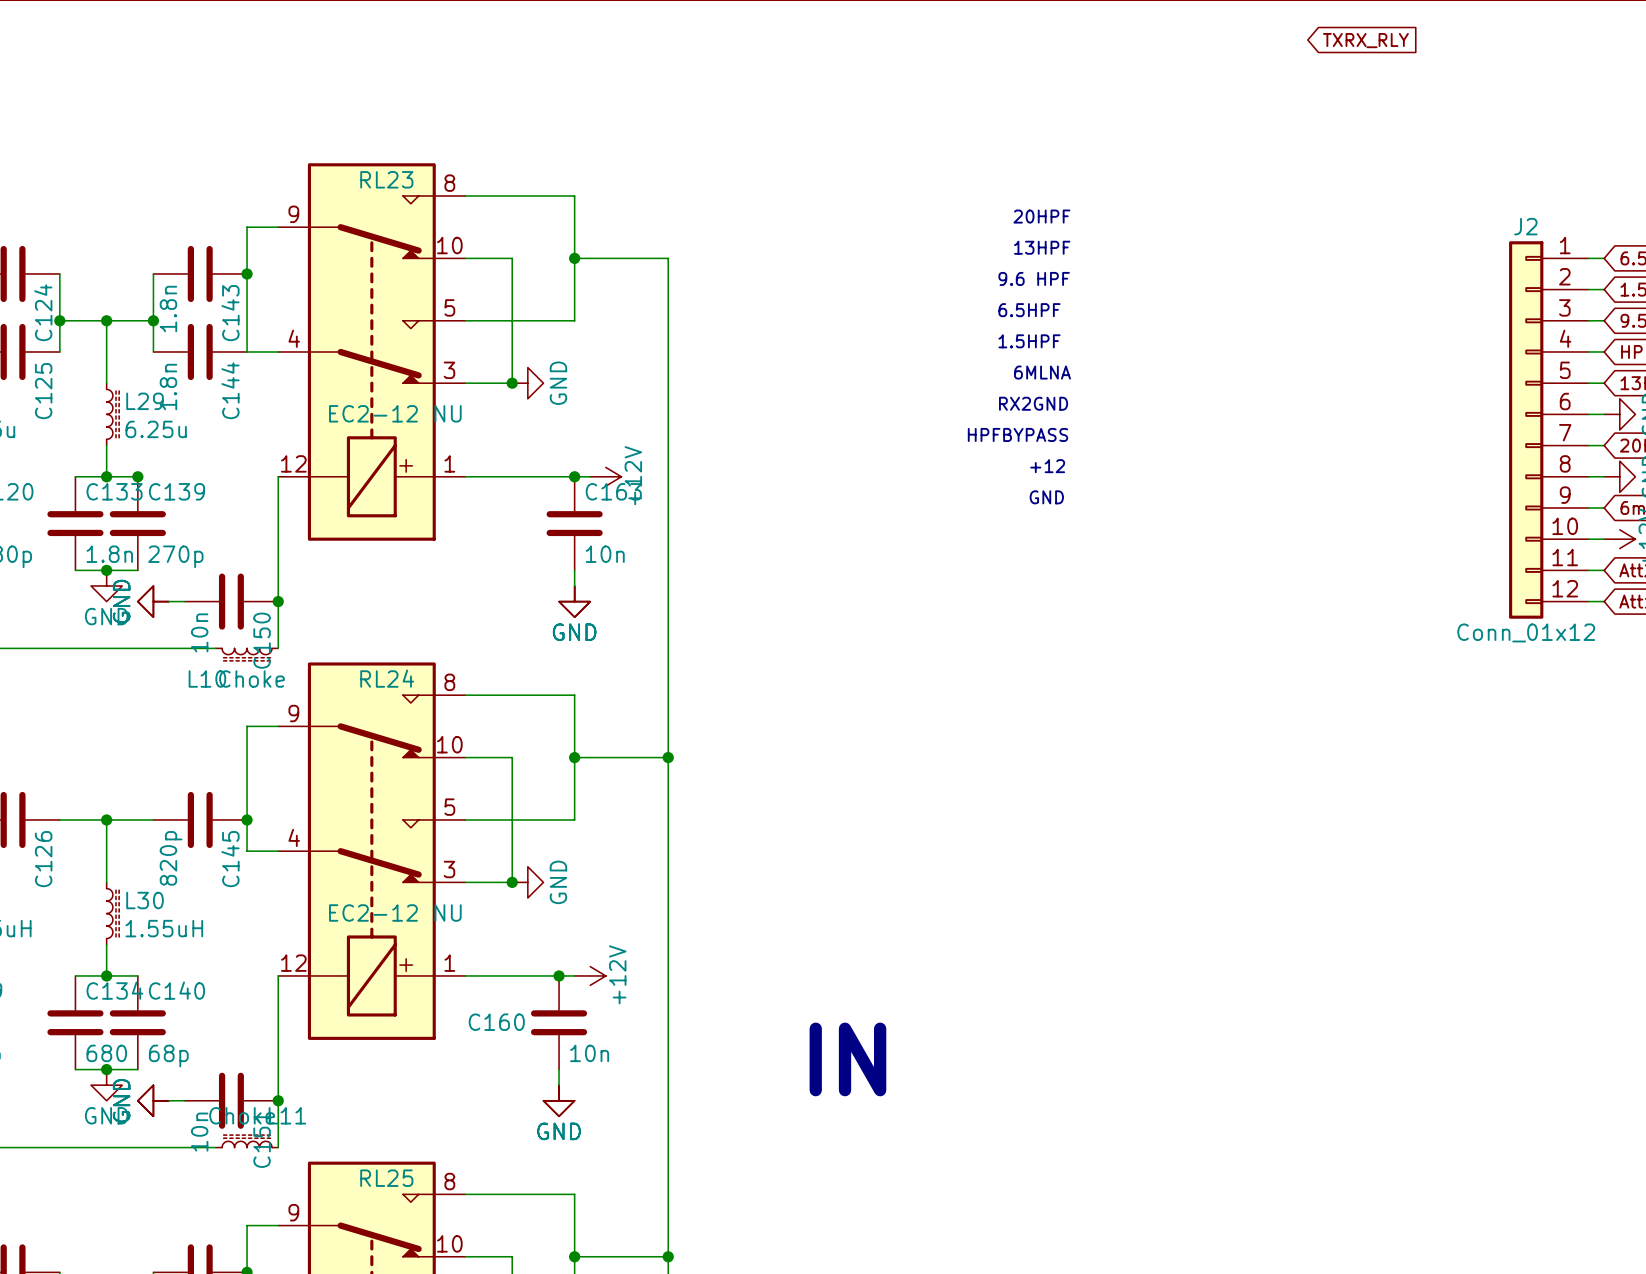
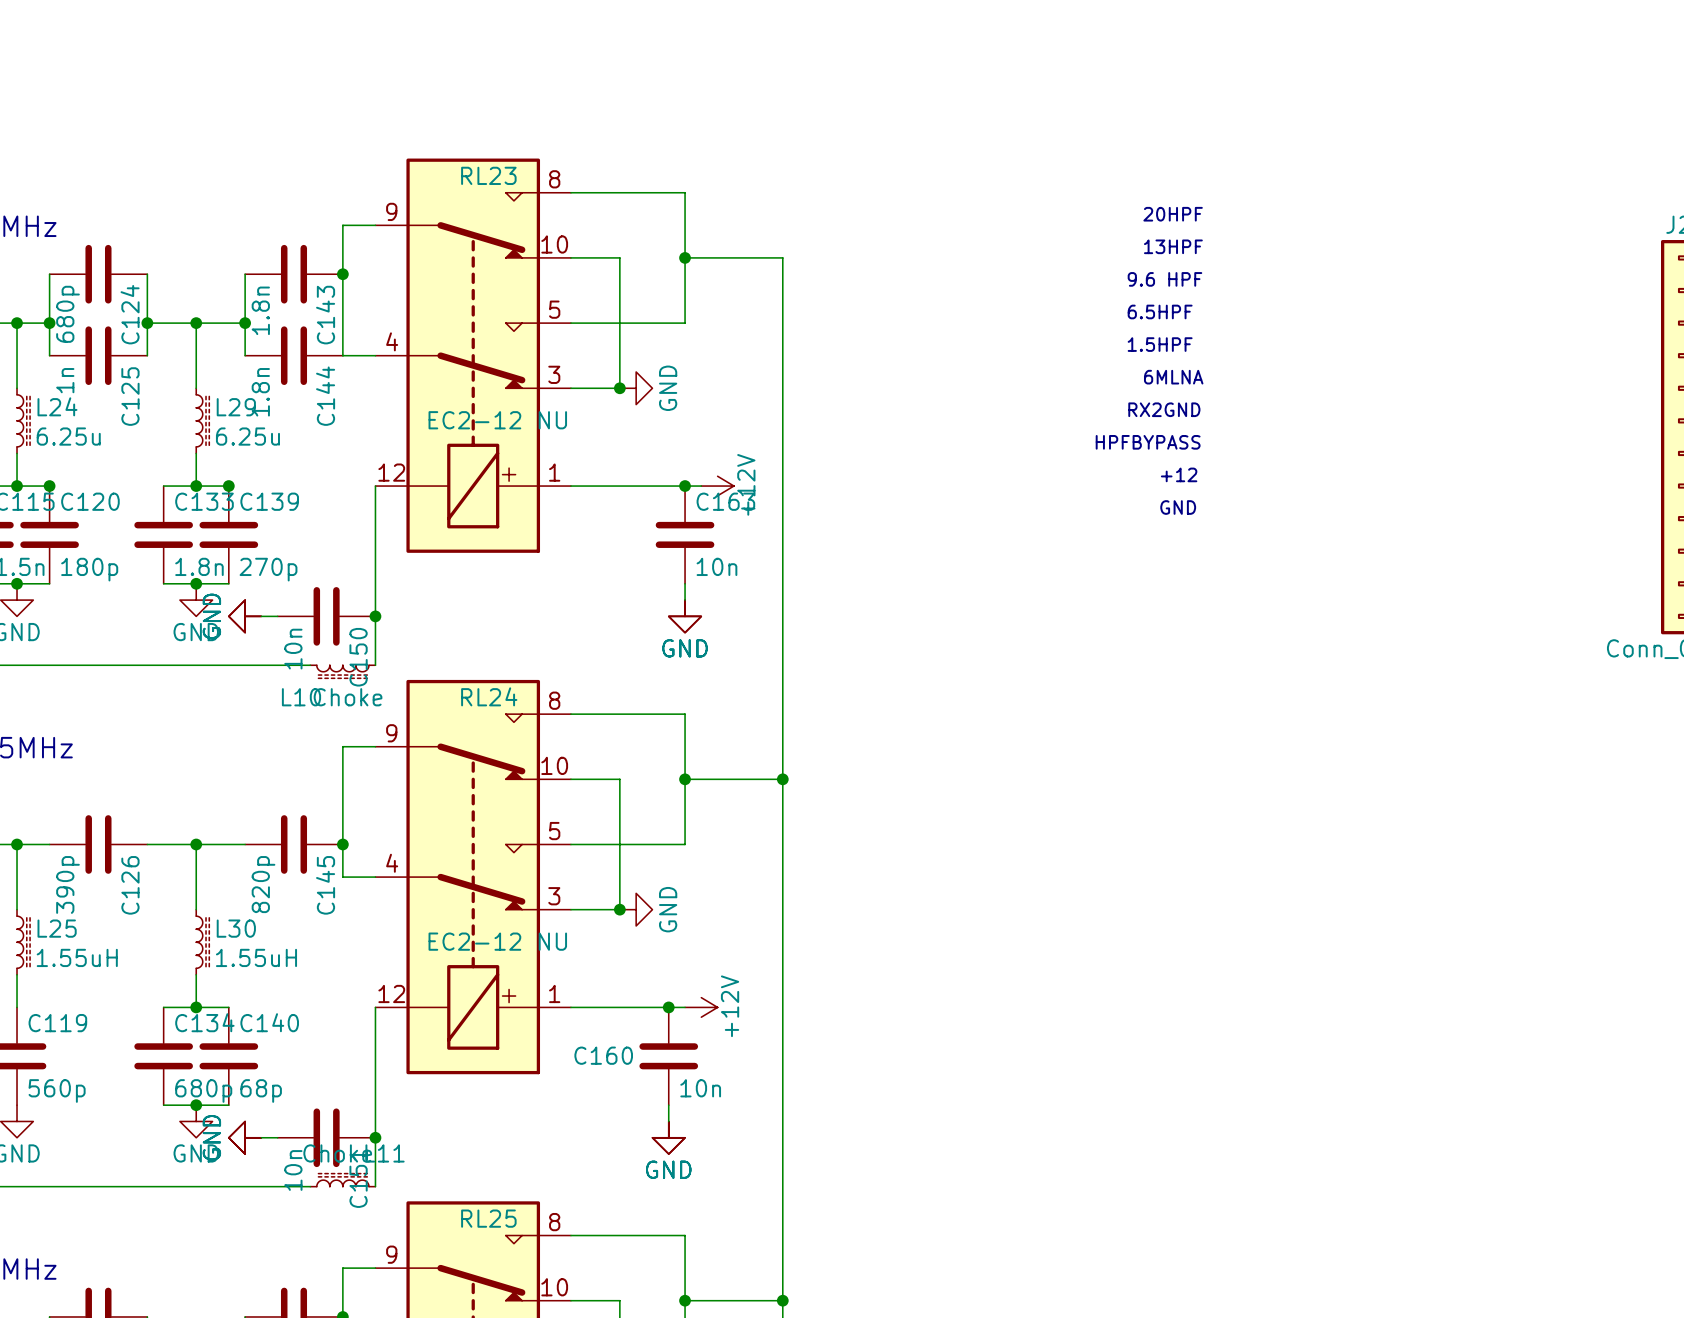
global label: TXRX_RLY (1365, 40) -> none
C134 value: 680 (106, 1053) -> 680p (203, 1090)
text: IN (847, 1059) -> none

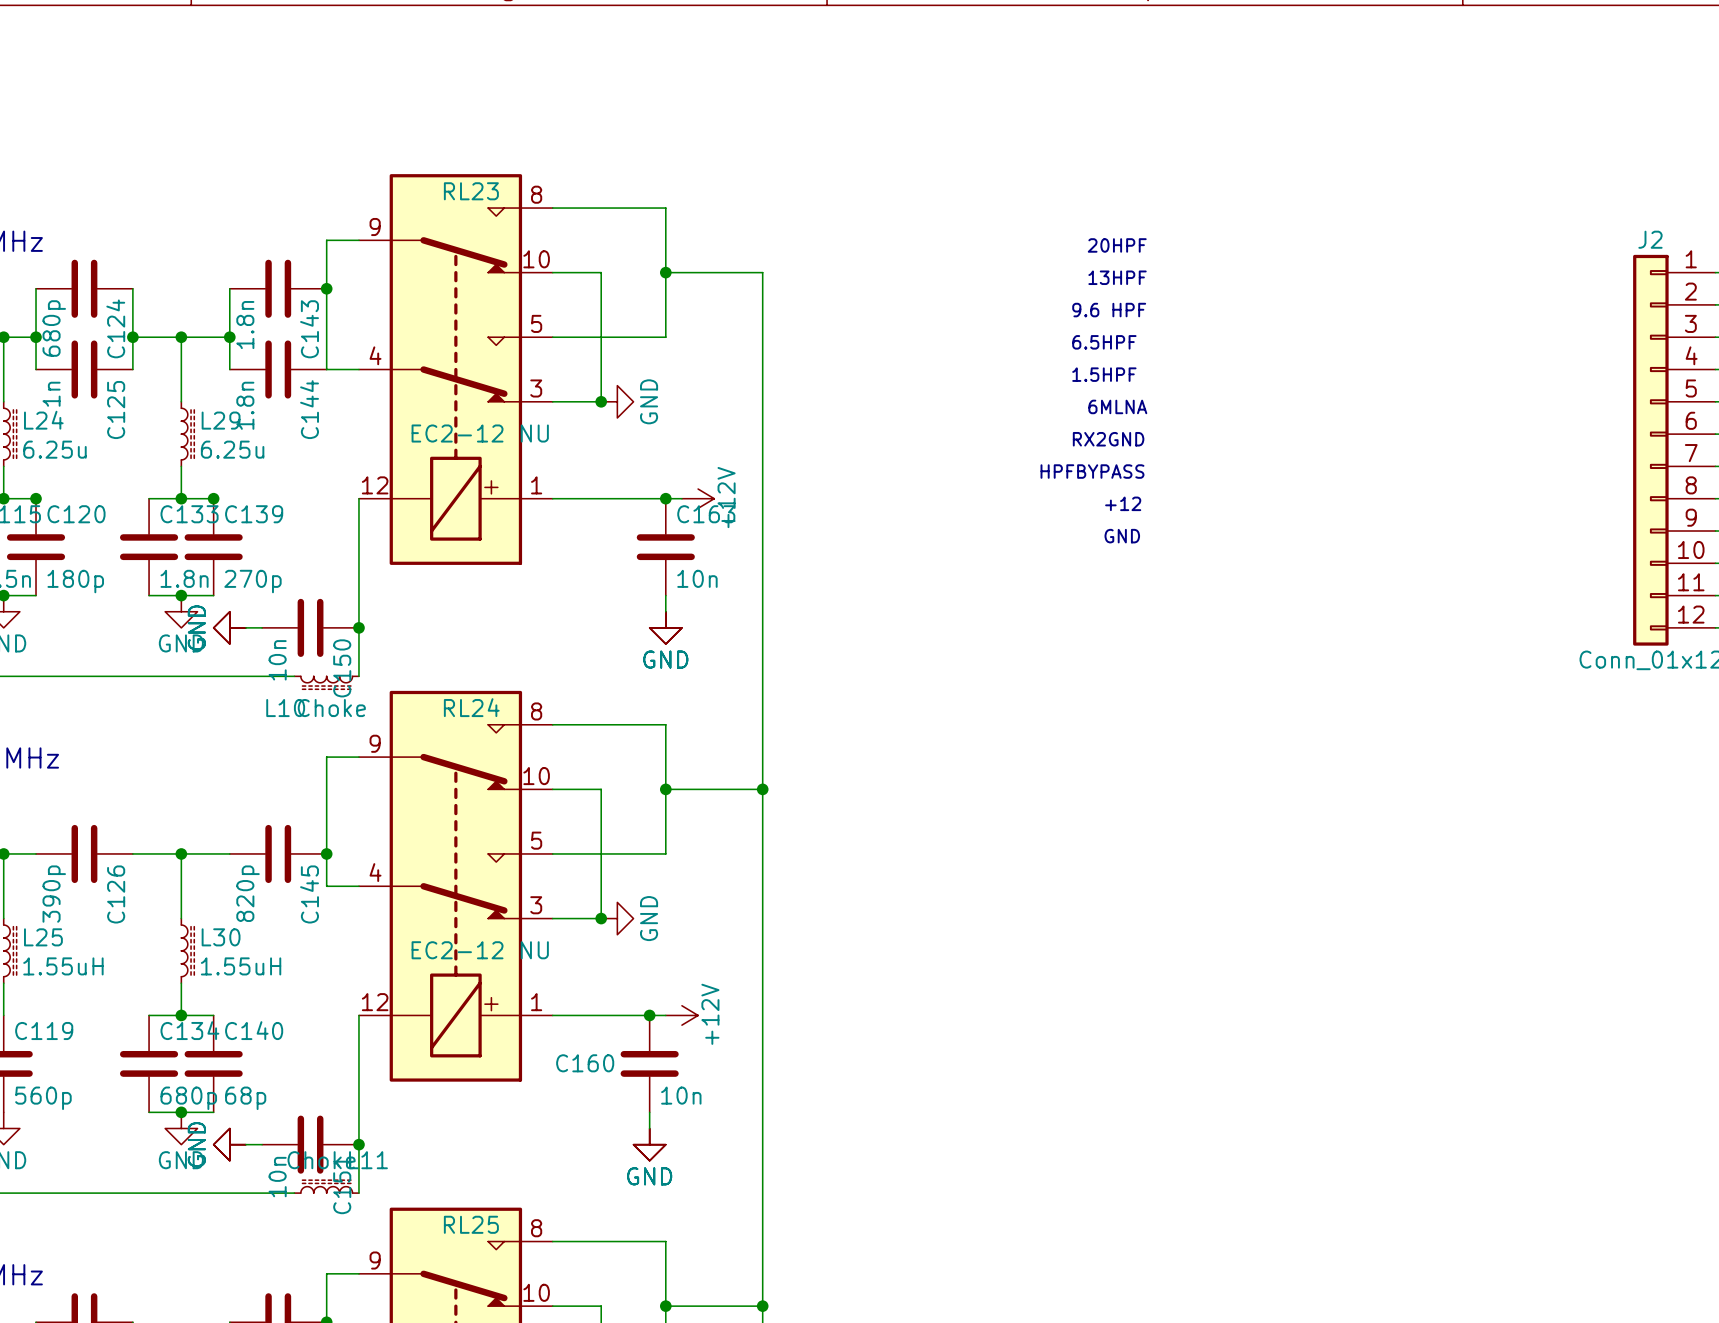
text position: 20HPF (1173, 214) -> 20HPF (1117, 245)
text position: 13HPF (1173, 246) -> 13HPF (1117, 277)
text position: 9.6 HPF (1164, 279) -> 9.6 HPF (1109, 310)
text position: 6.5HPF (1160, 311) -> 6.5HPF (1104, 342)
text position: 1.5HPF (1160, 344) -> 1.5HPF (1104, 374)
text position: 6MLNA (1173, 377) -> 6MLNA (1117, 406)
text position: RX2GND (1164, 409) -> RX2GND (1108, 439)
text position: HPFBYPASS (1148, 442) -> HPFBYPASS (1092, 471)
text position: +12 (1179, 474) -> +12 (1123, 503)
text position: GND (1178, 507) -> GND (1122, 536)

